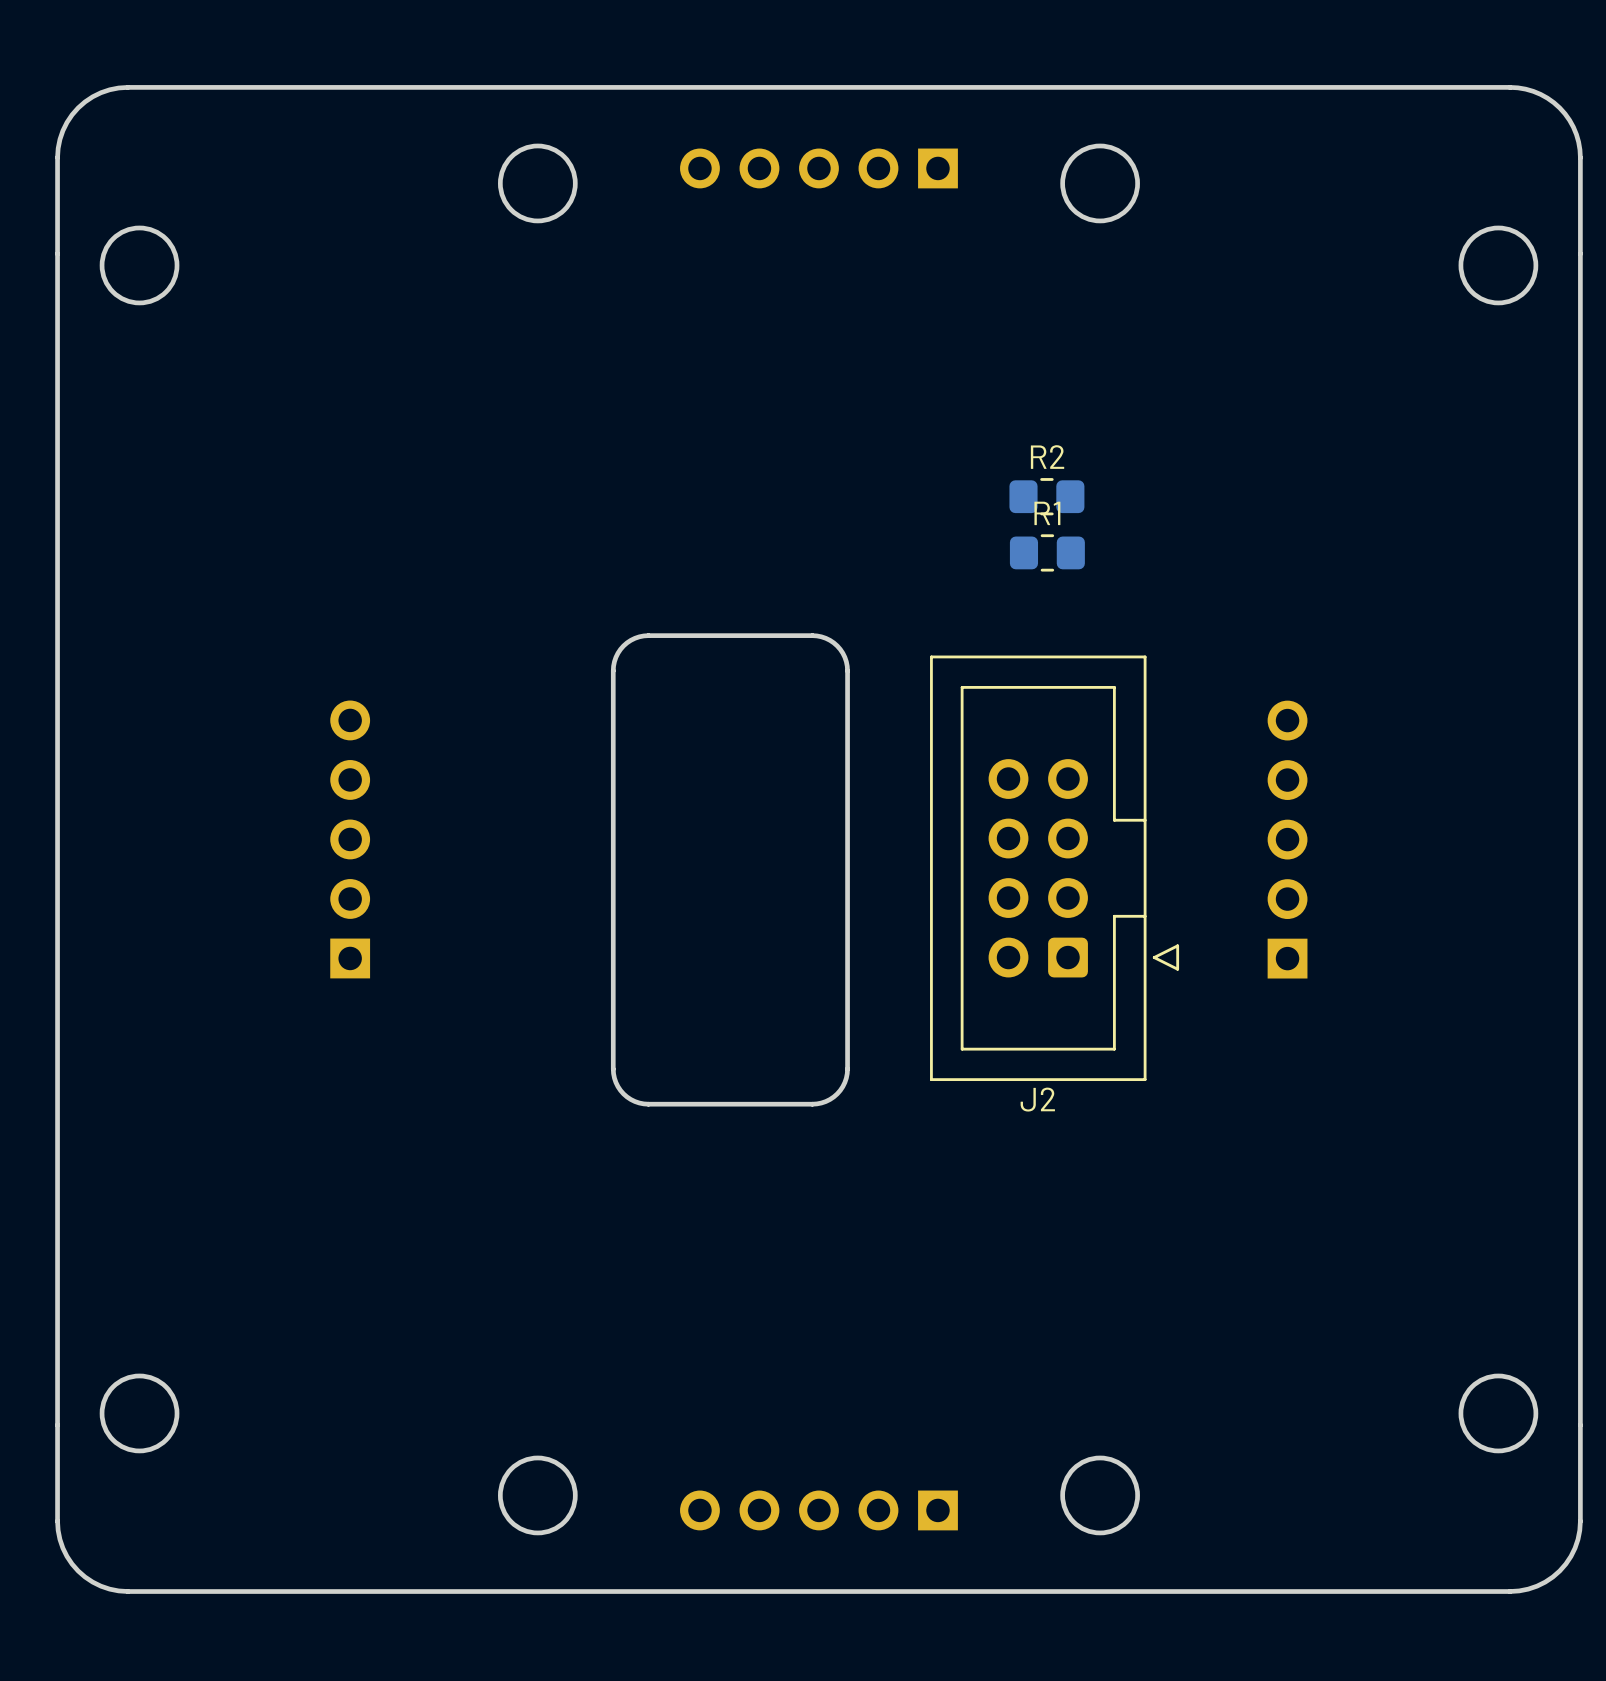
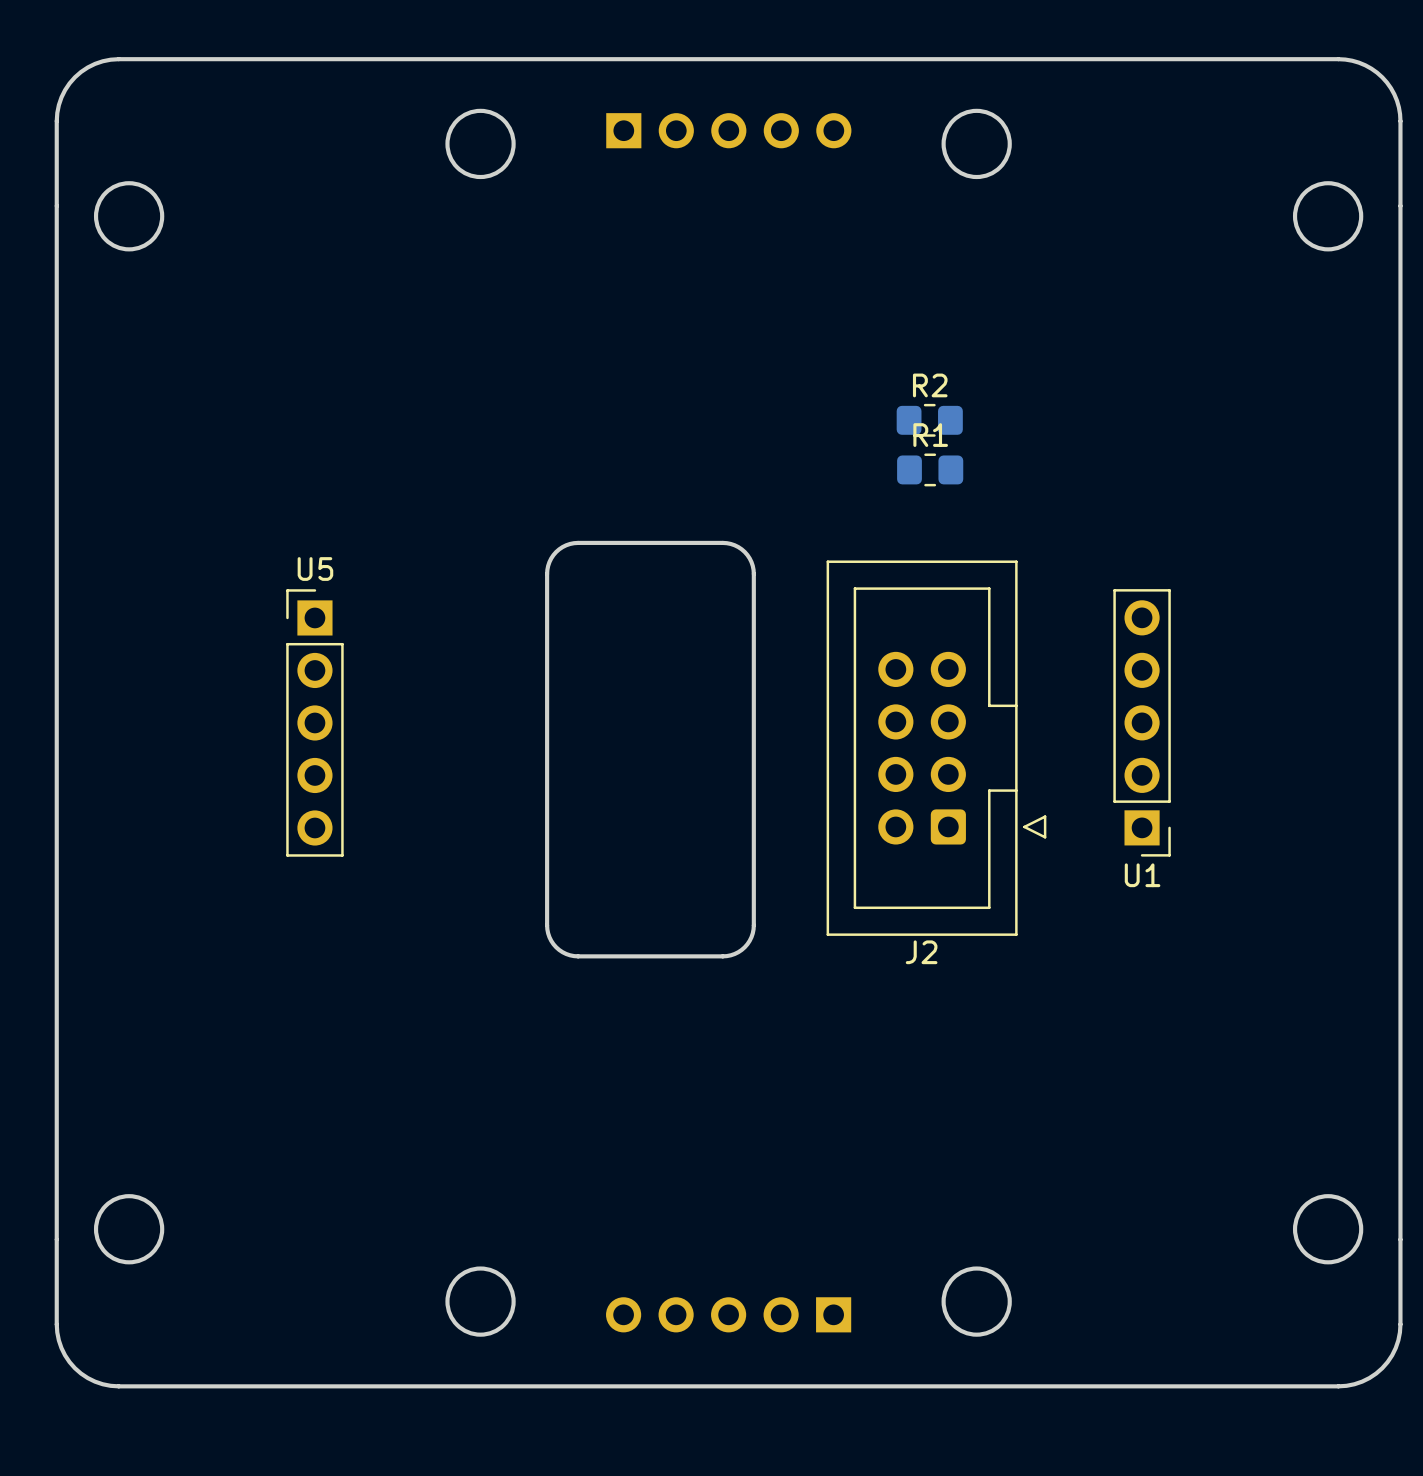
part rotation: 0° (818, 168) -> 180° (728, 130)
U5 side: top (350, 839) -> bottom (314, 722)
U1 side: top (1287, 839) -> bottom (1142, 722)

